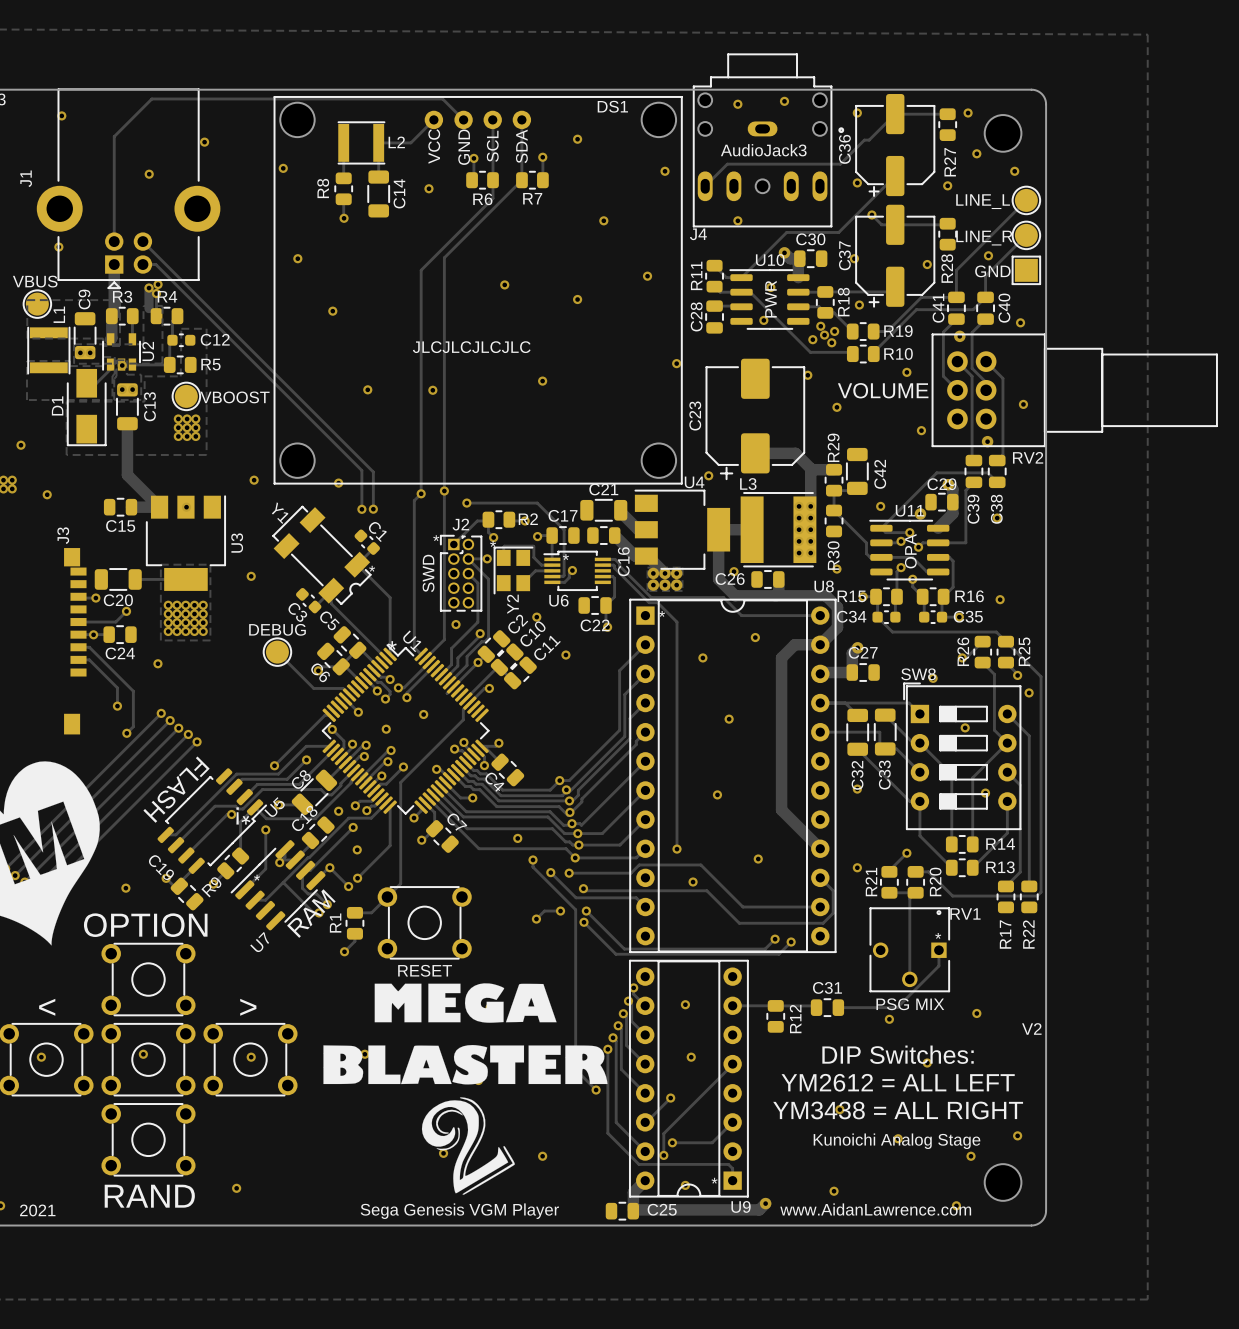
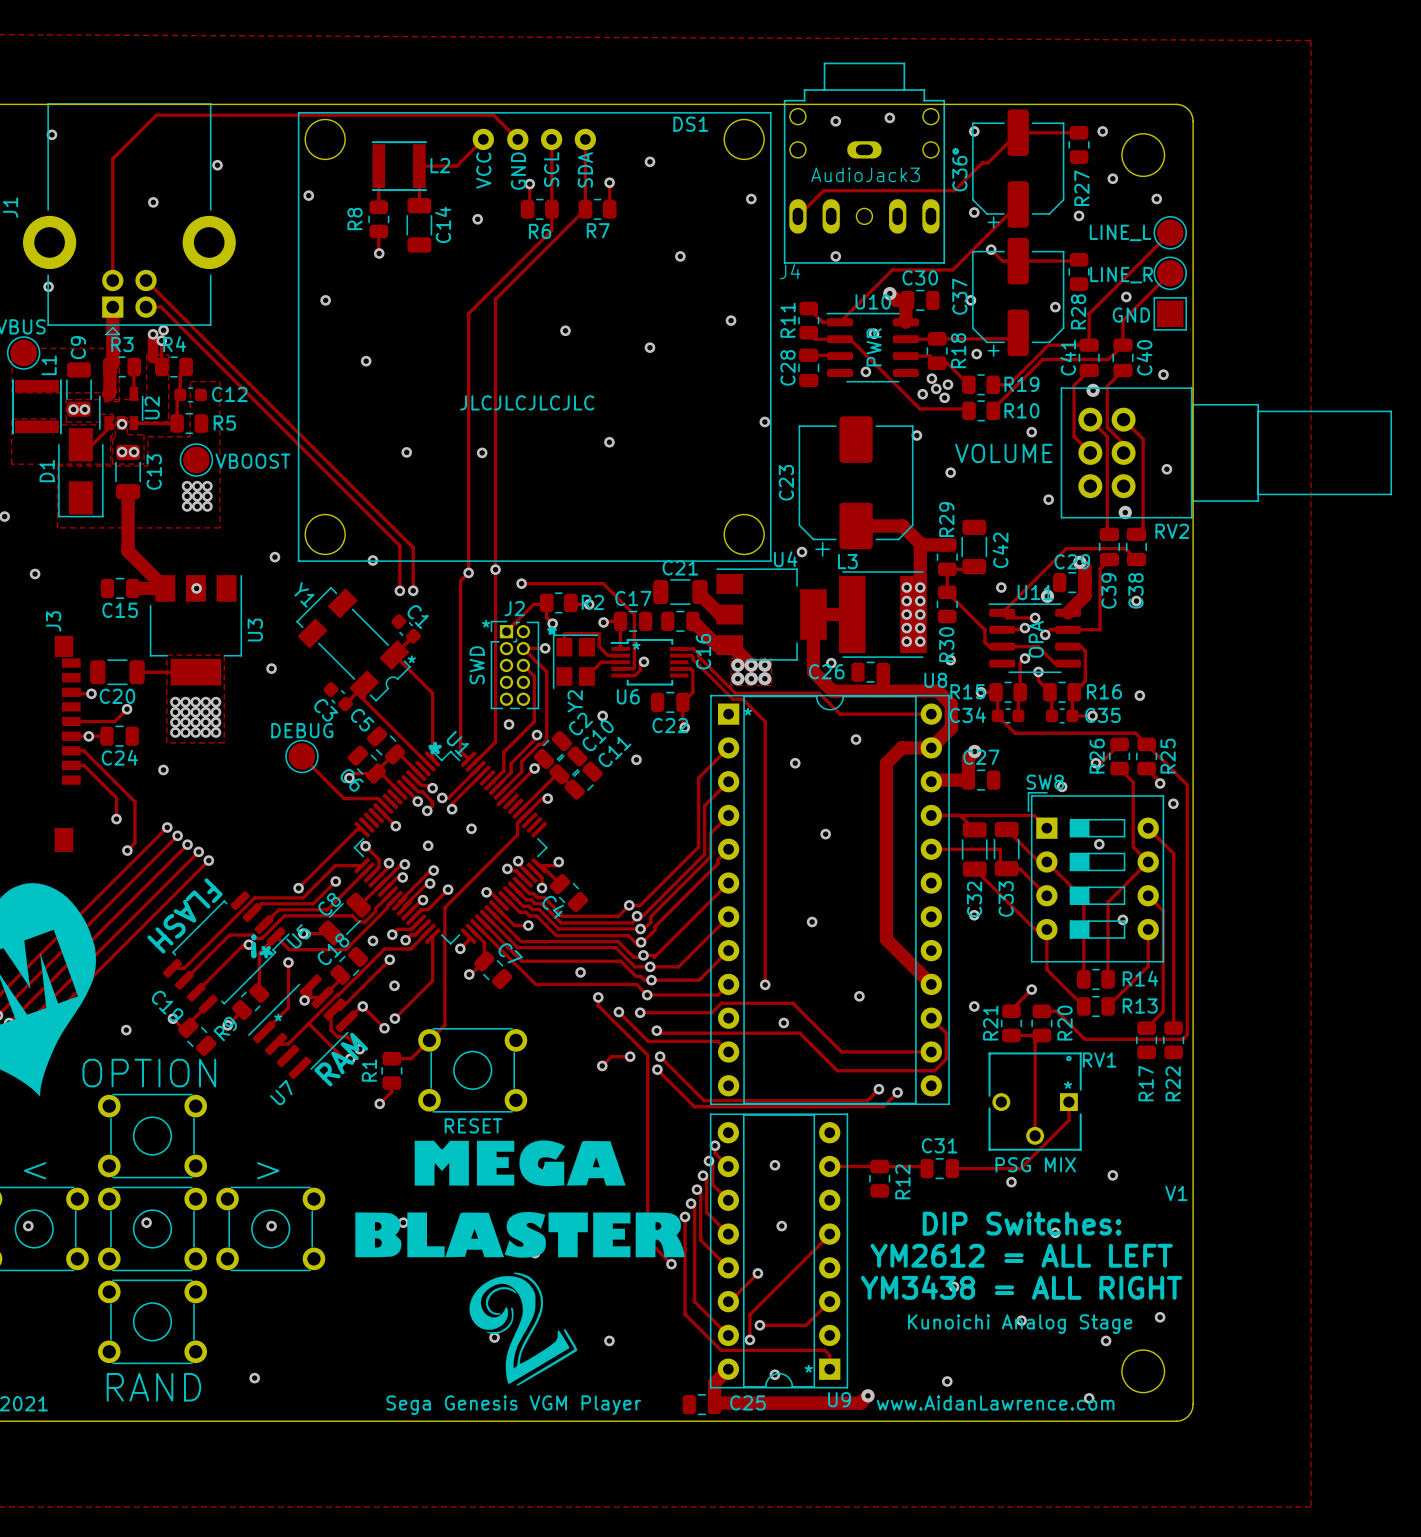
text: V2 (1031, 1028) -> V1 (1176, 1193)

